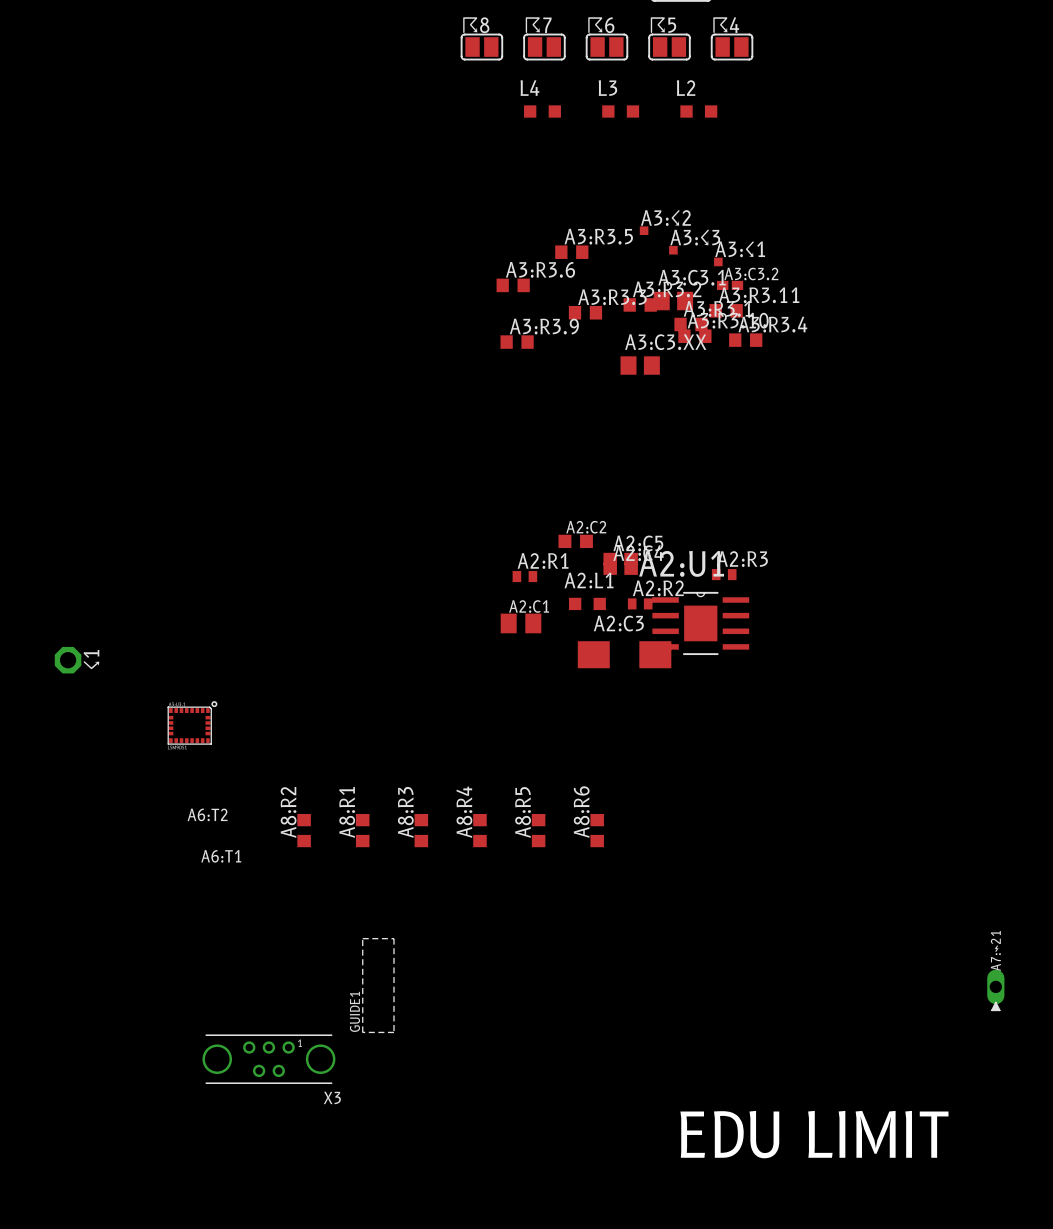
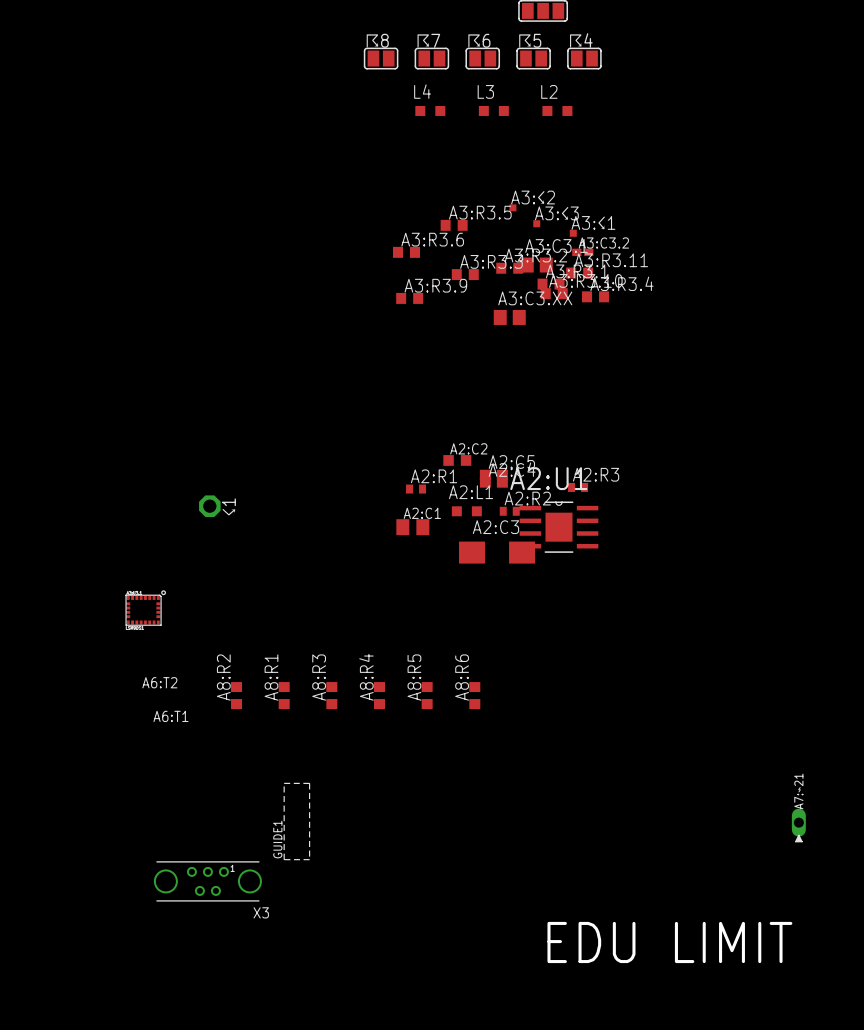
☇1 position: (68, 660) -> (209, 506)

